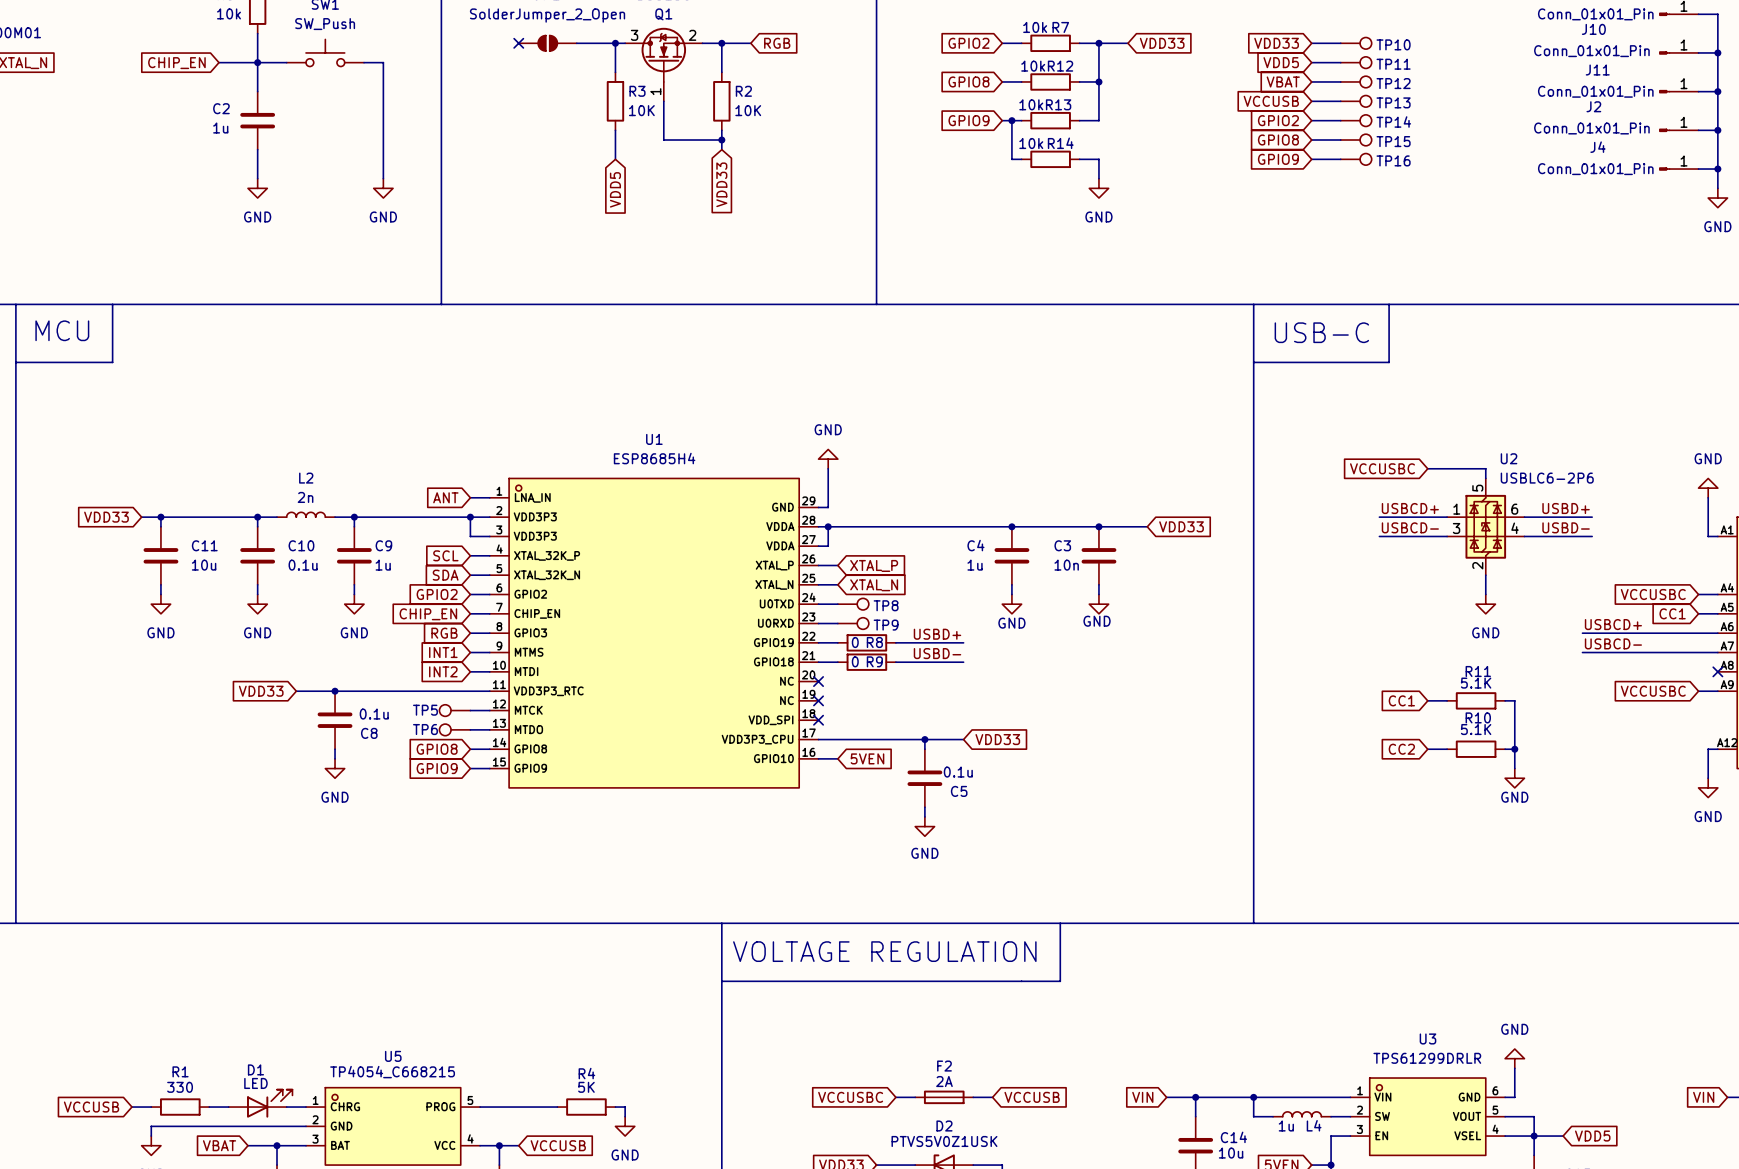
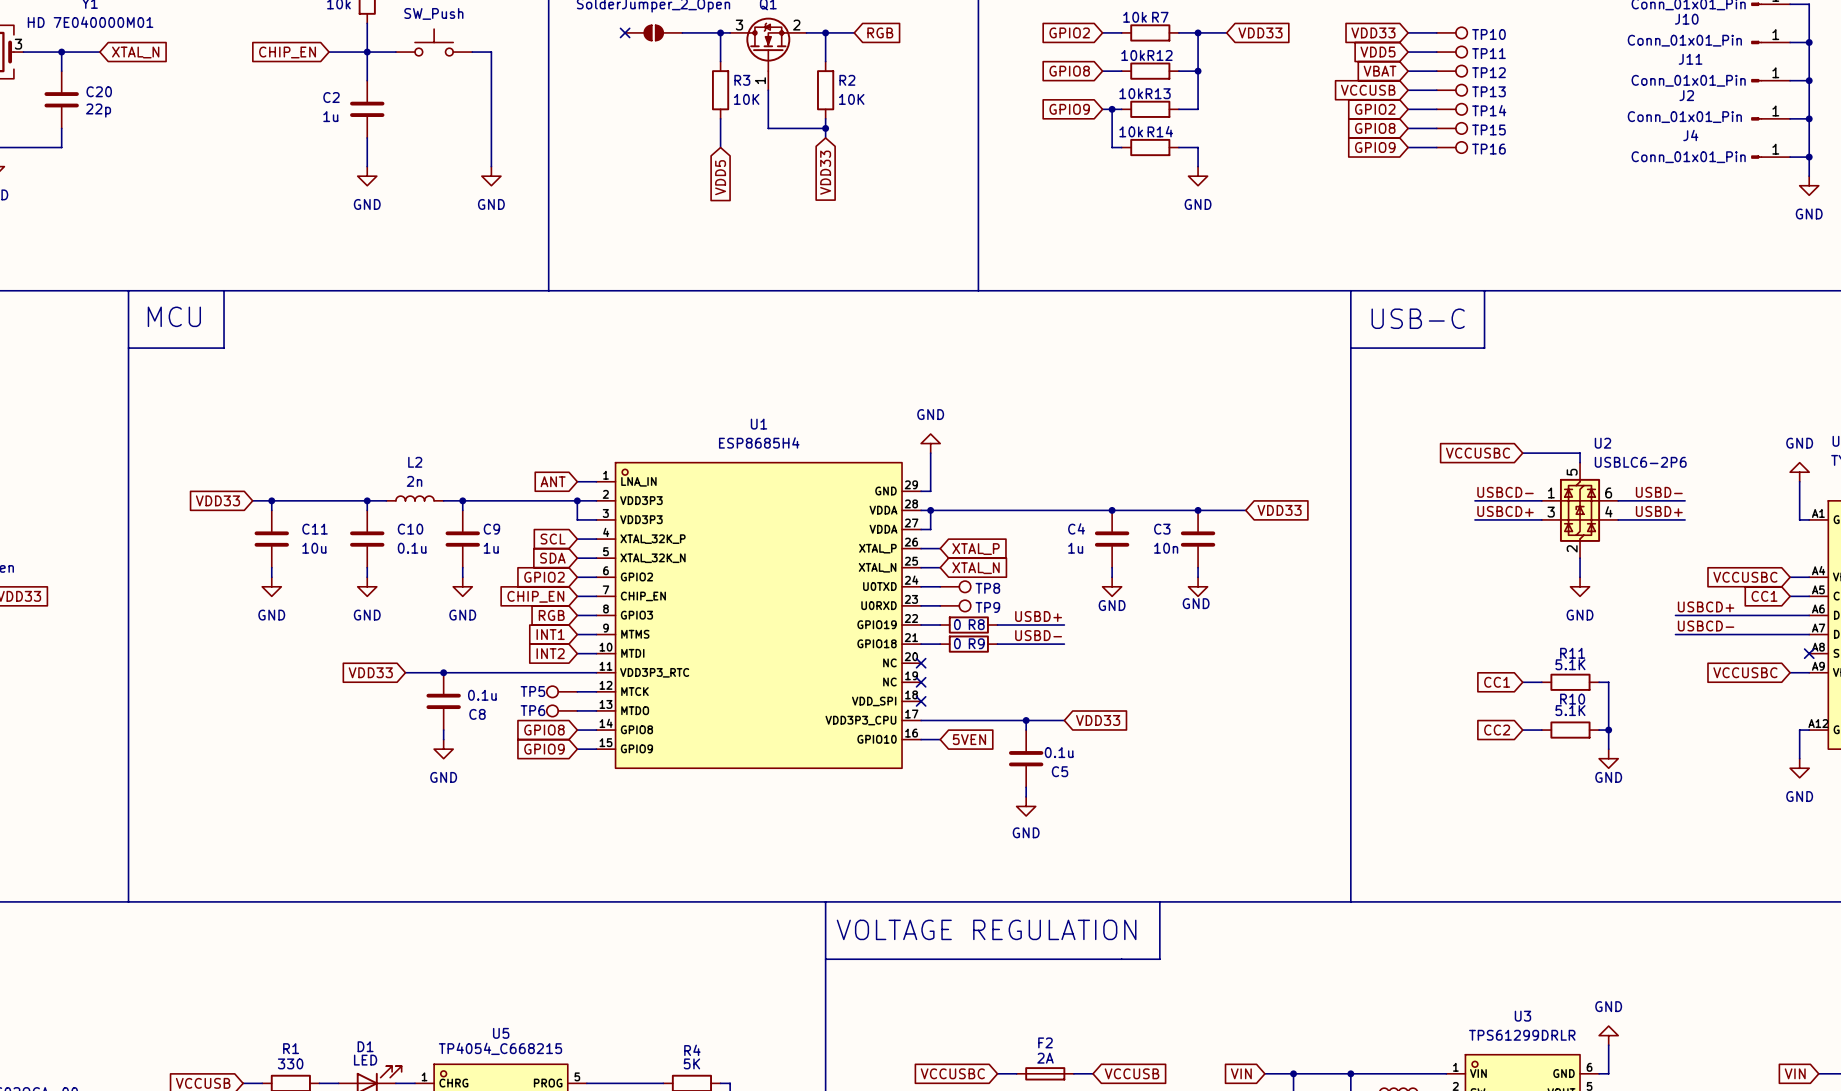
label: USBCD+ (1410, 508) -> USBCD- (1505, 492)
label: USBD+ (1566, 508) -> USBD- (1659, 492)
label: USBCD- (1410, 527) -> USBCD+ (1505, 511)
label: USBD- (1566, 527) -> USBD+ (1659, 511)

